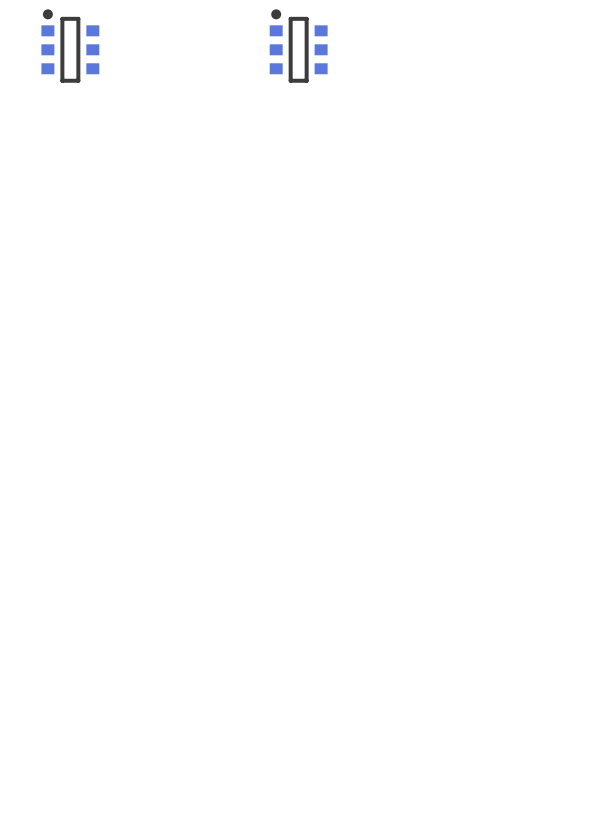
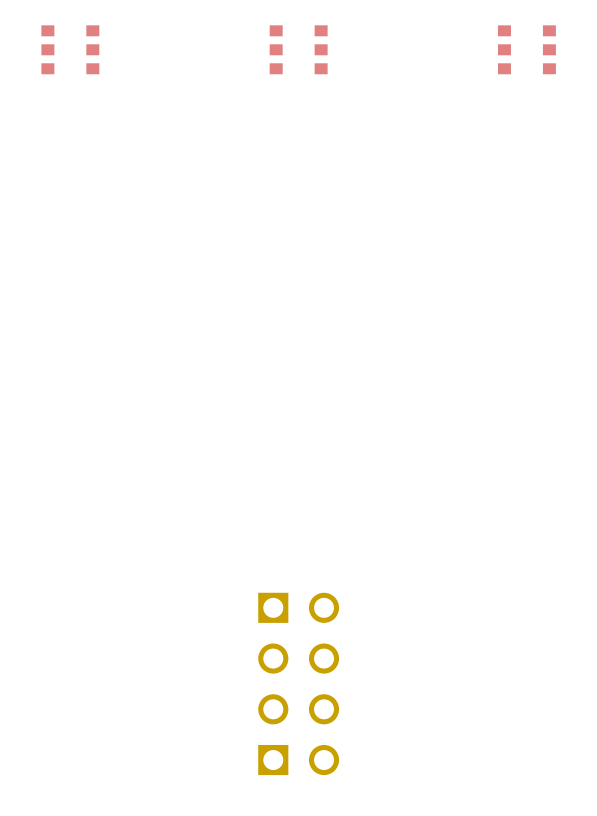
part side: bottom (70, 46) -> top (70, 49)
part side: bottom (298, 46) -> top (298, 49)
part: none -> (526, 49)
part: none -> (298, 683)

